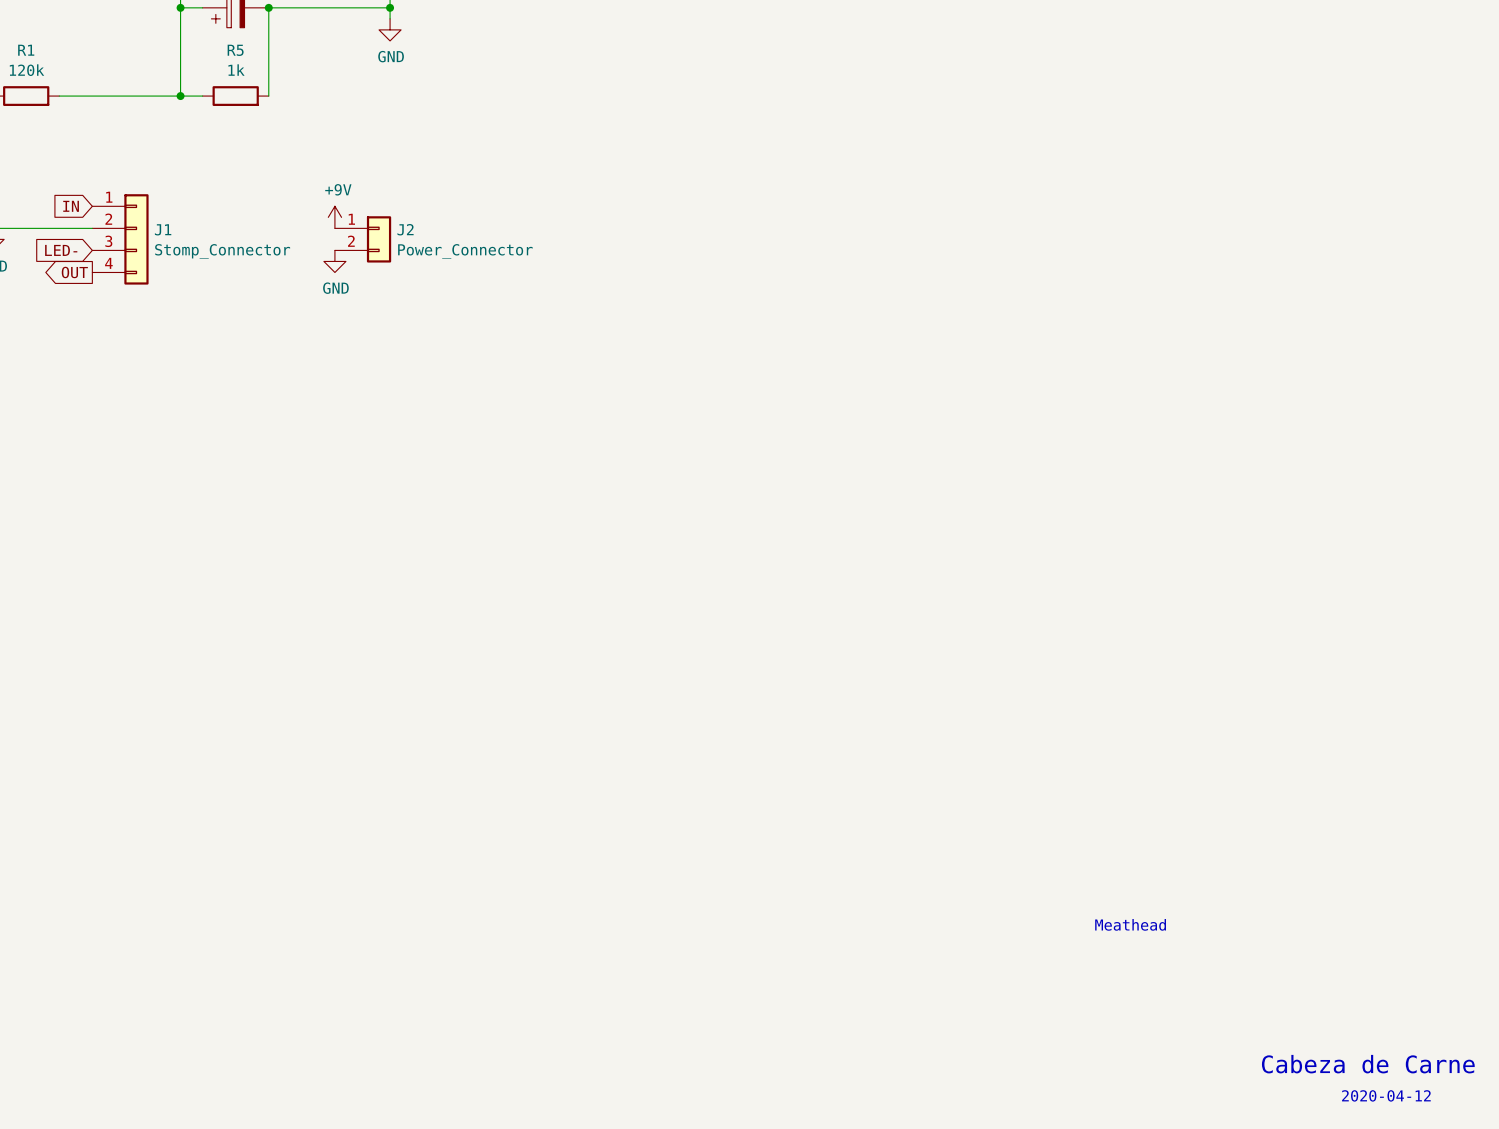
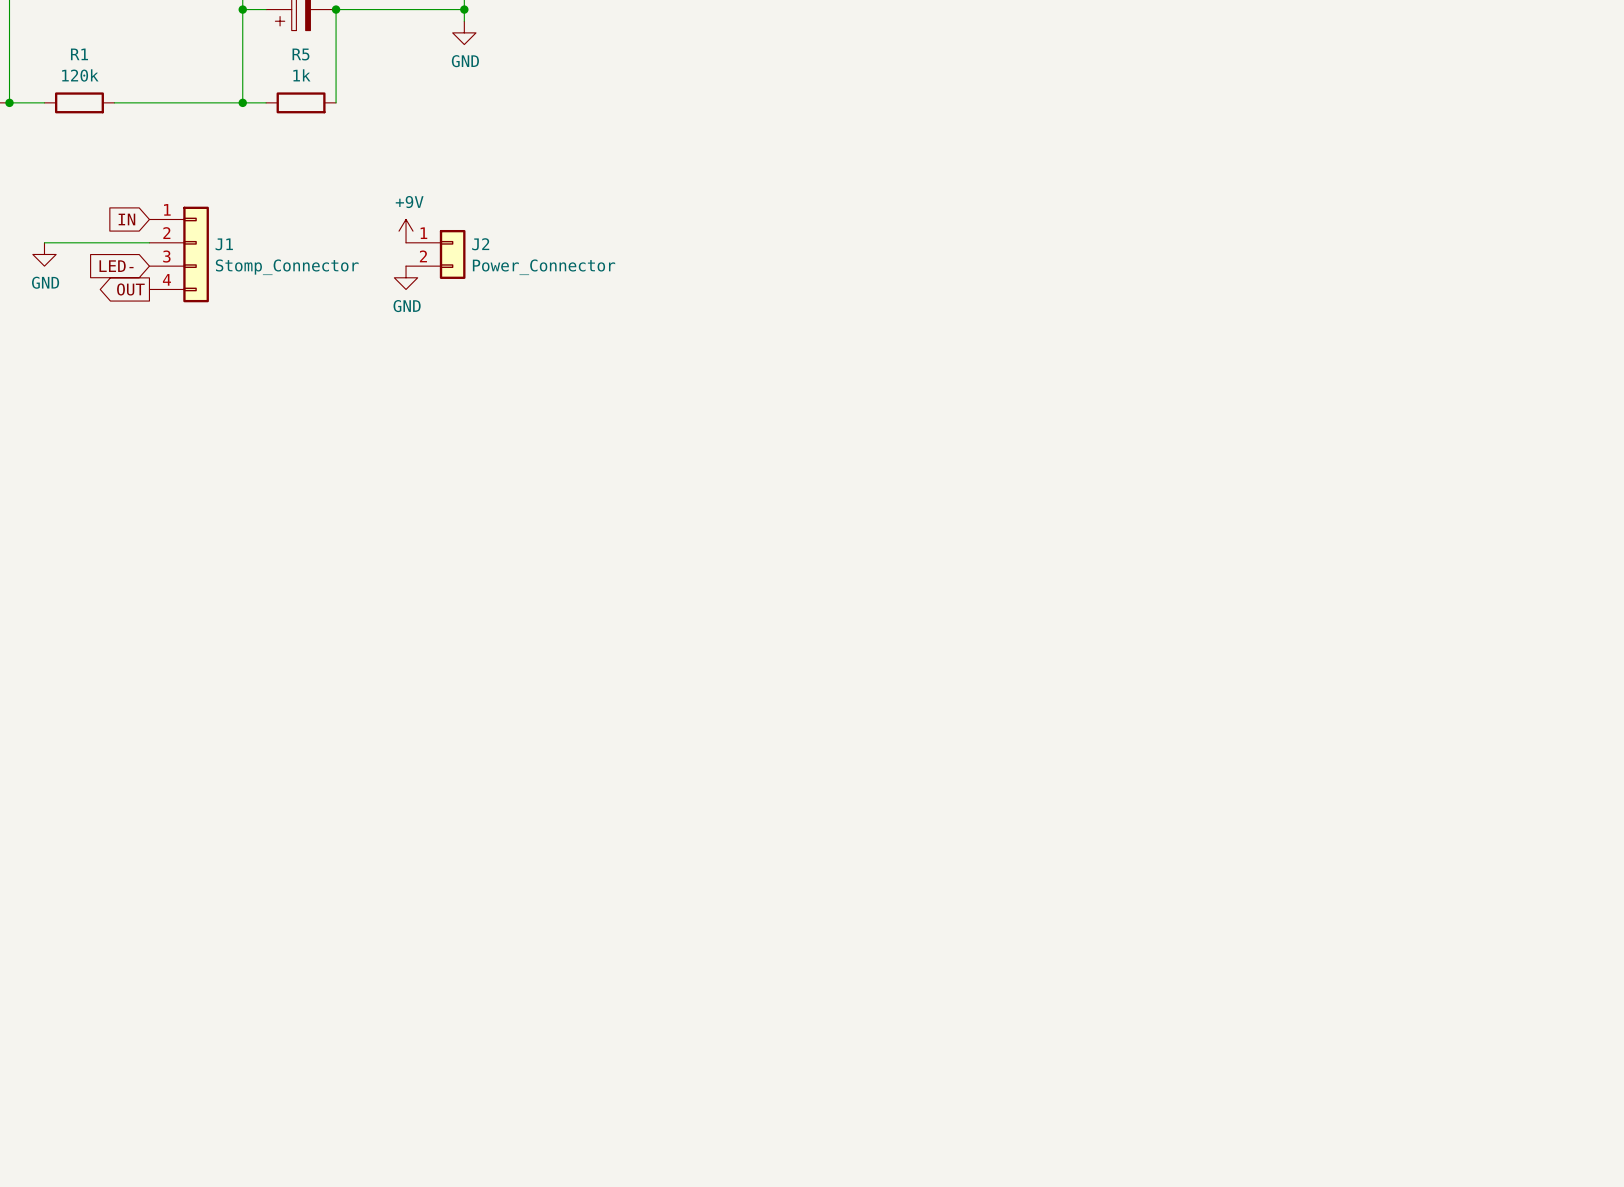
text: Meathead (1130, 924) -> none
text: Cabeza de Carne (1368, 1064) -> none
text: 2020-04-12 (1386, 1095) -> none

